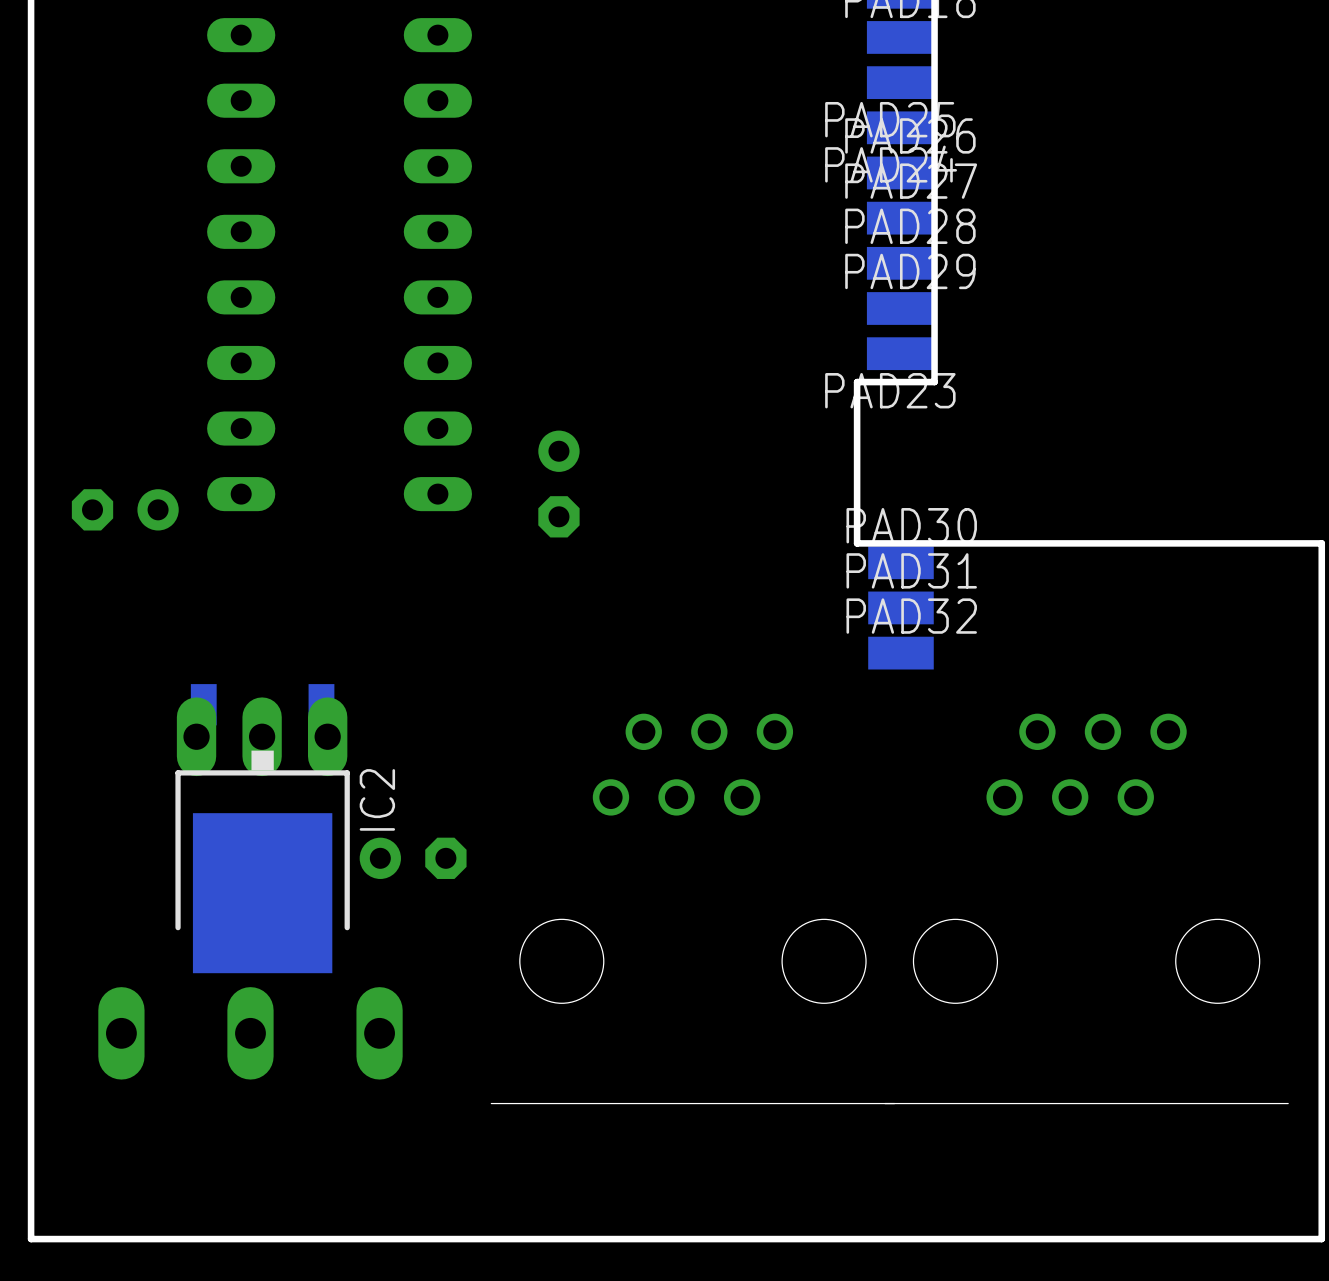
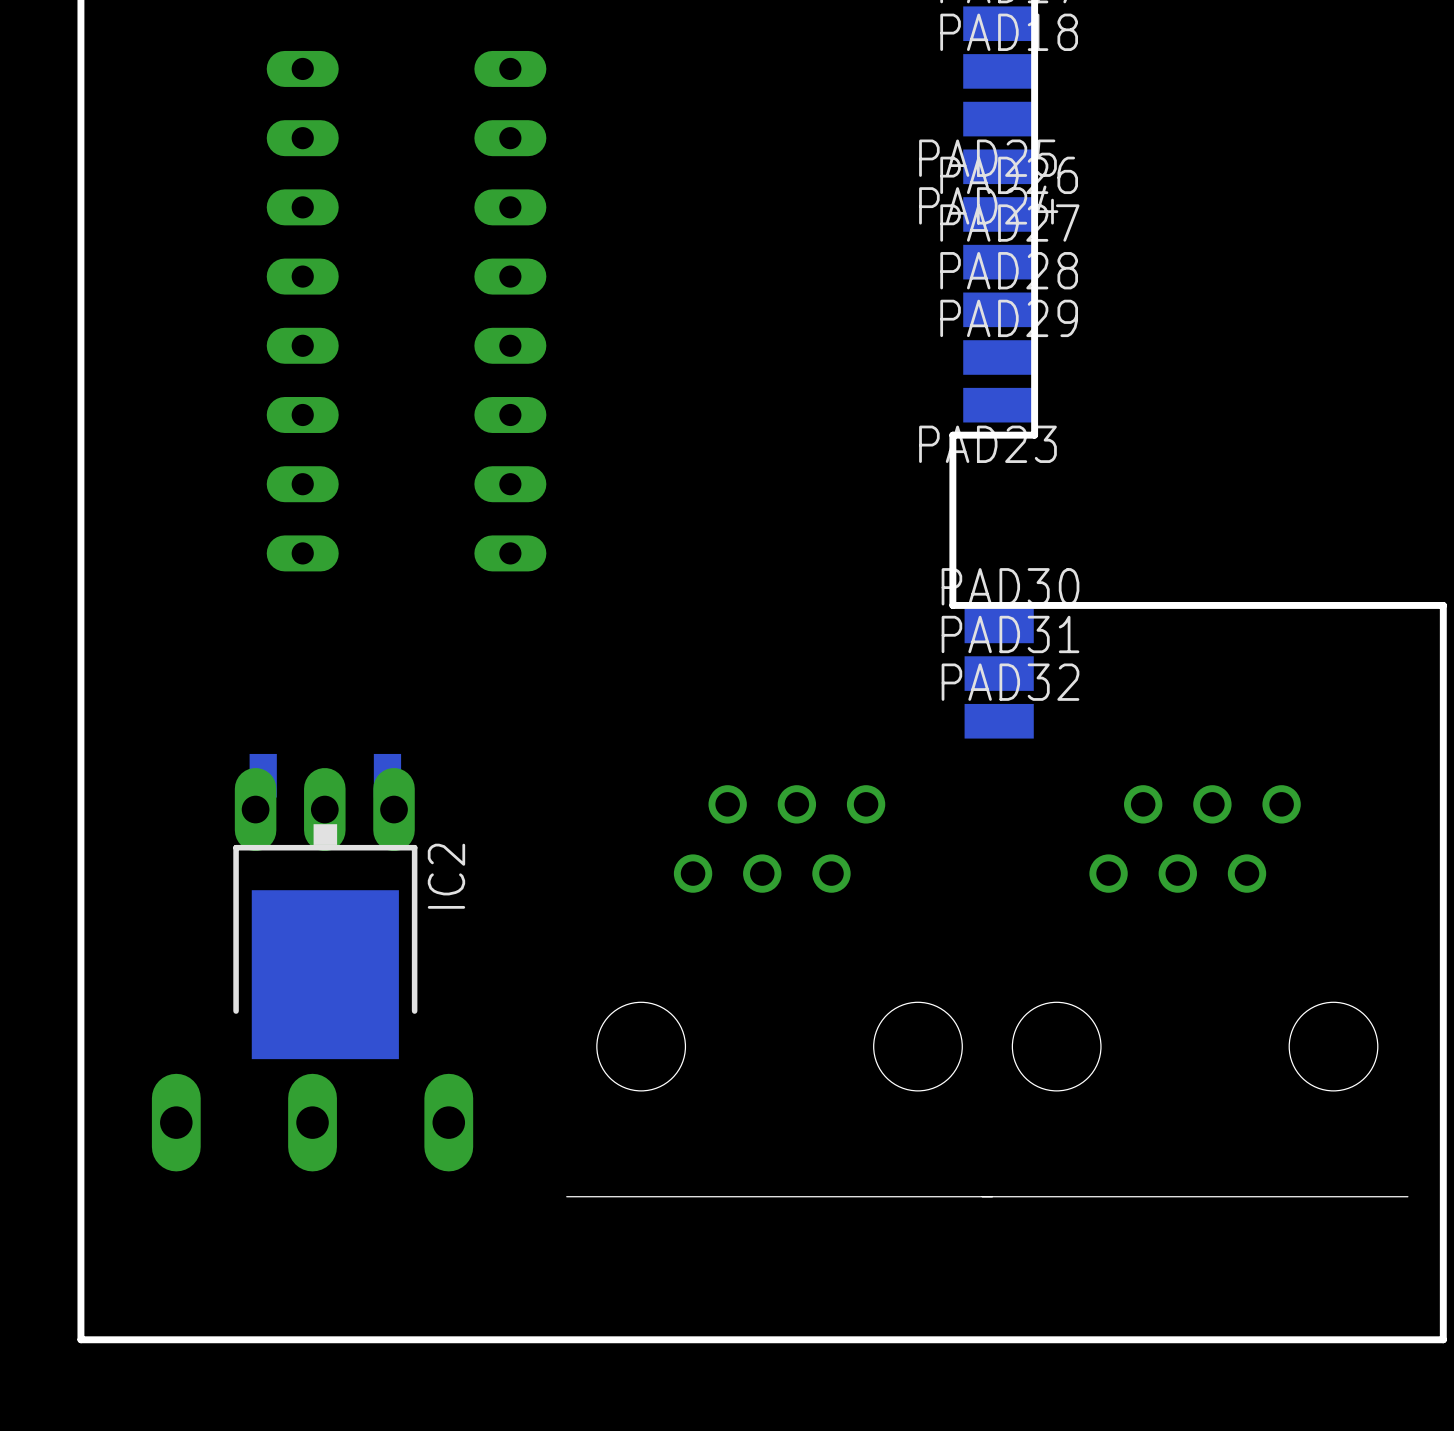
part: (558, 484) -> none
part: (125, 509) -> none
part: (413, 858) -> none

